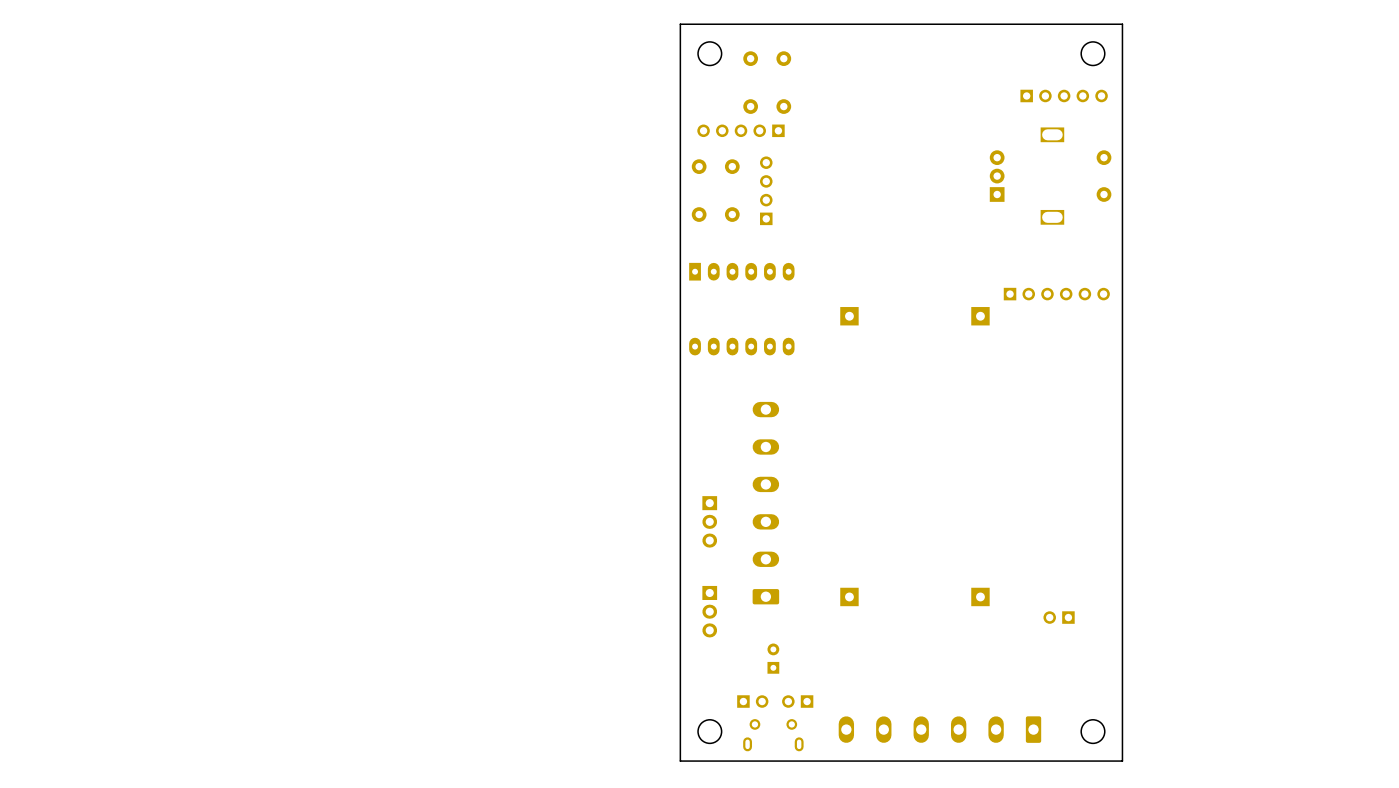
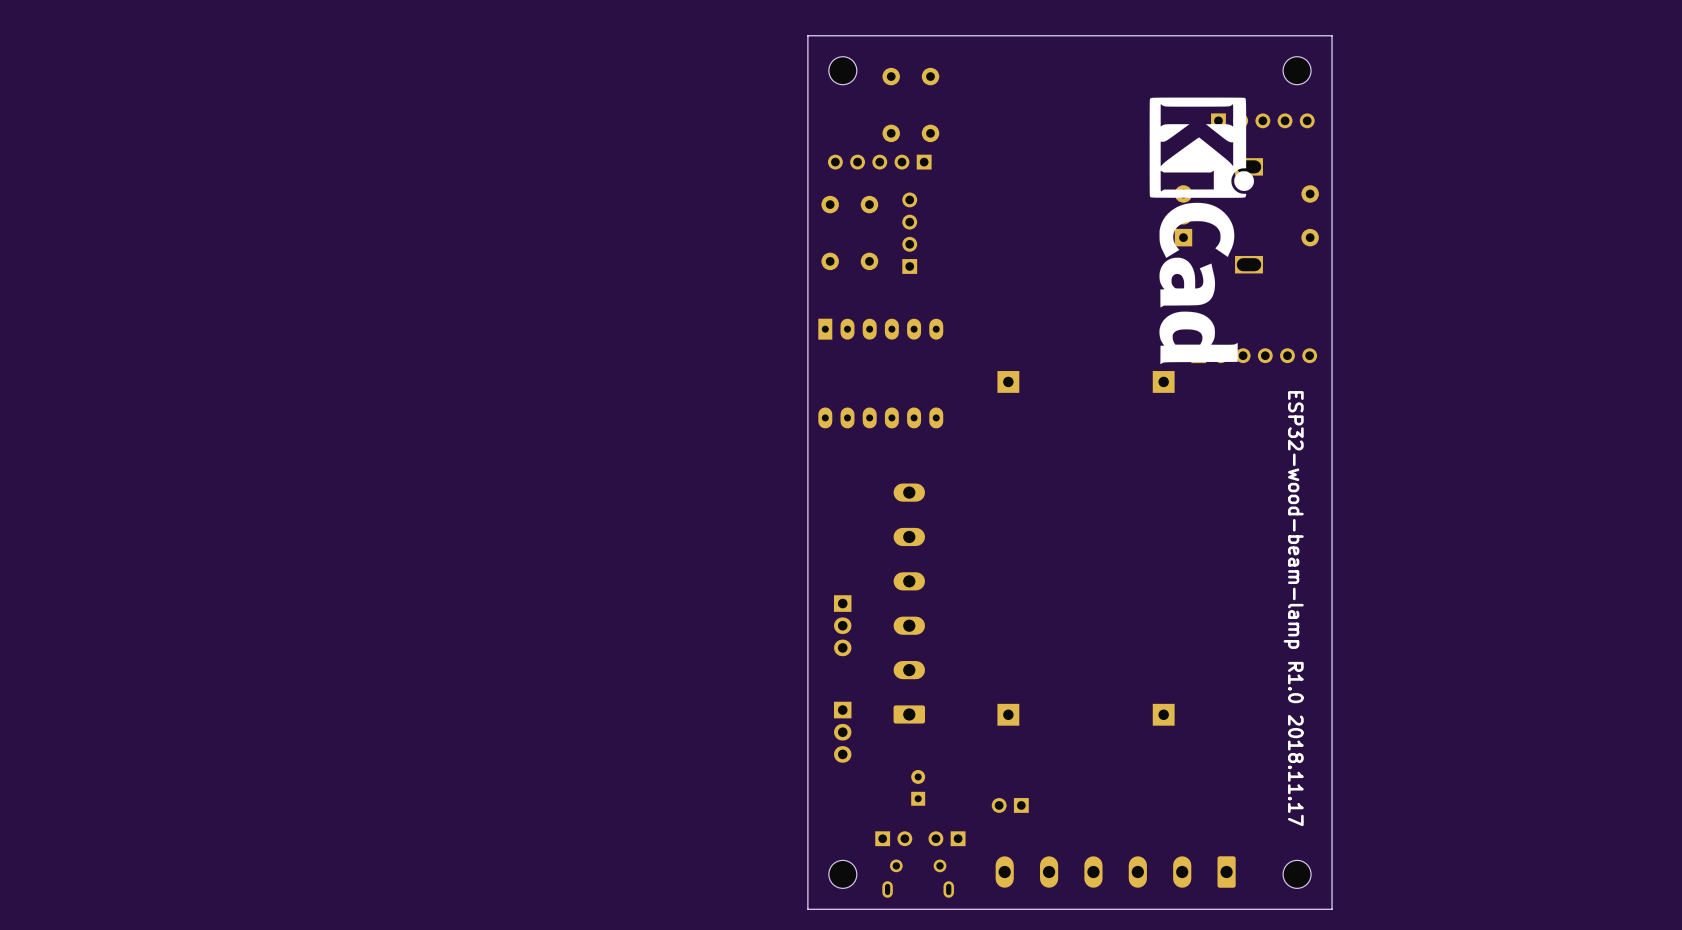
drawing: none -> [1149, 97, 1254, 365]
text: none -> ESP32-wood-beam-lamp R1.0 2018.11.17 (1293, 608)
part: (1059, 617) -> none
part: none -> (1010, 805)

